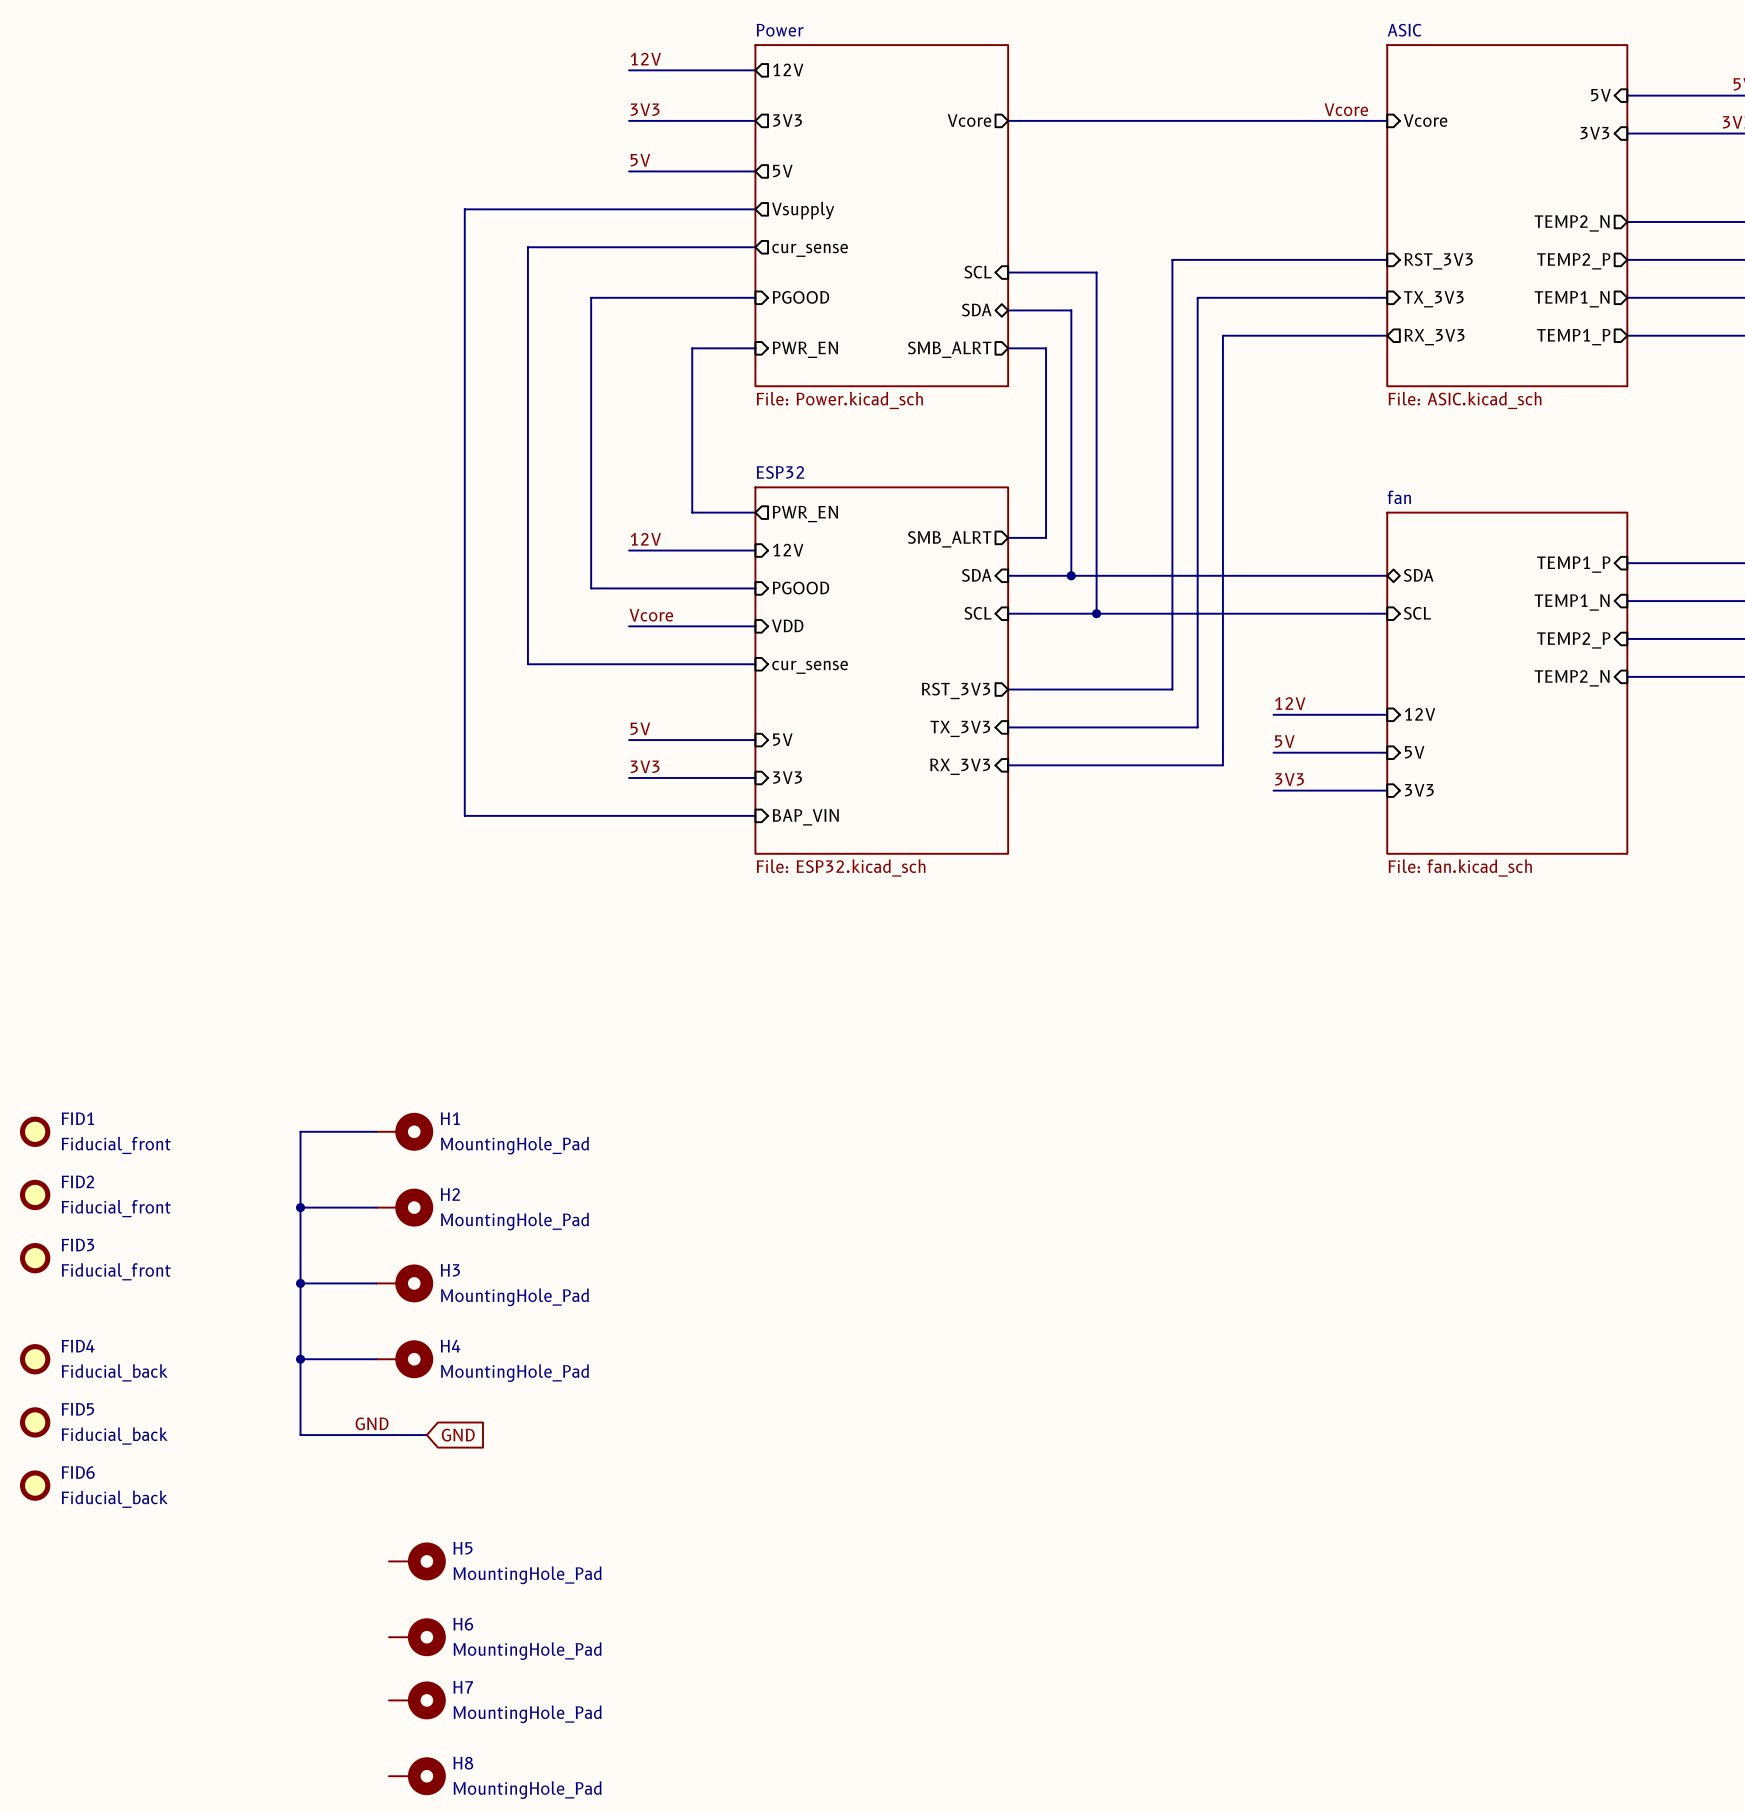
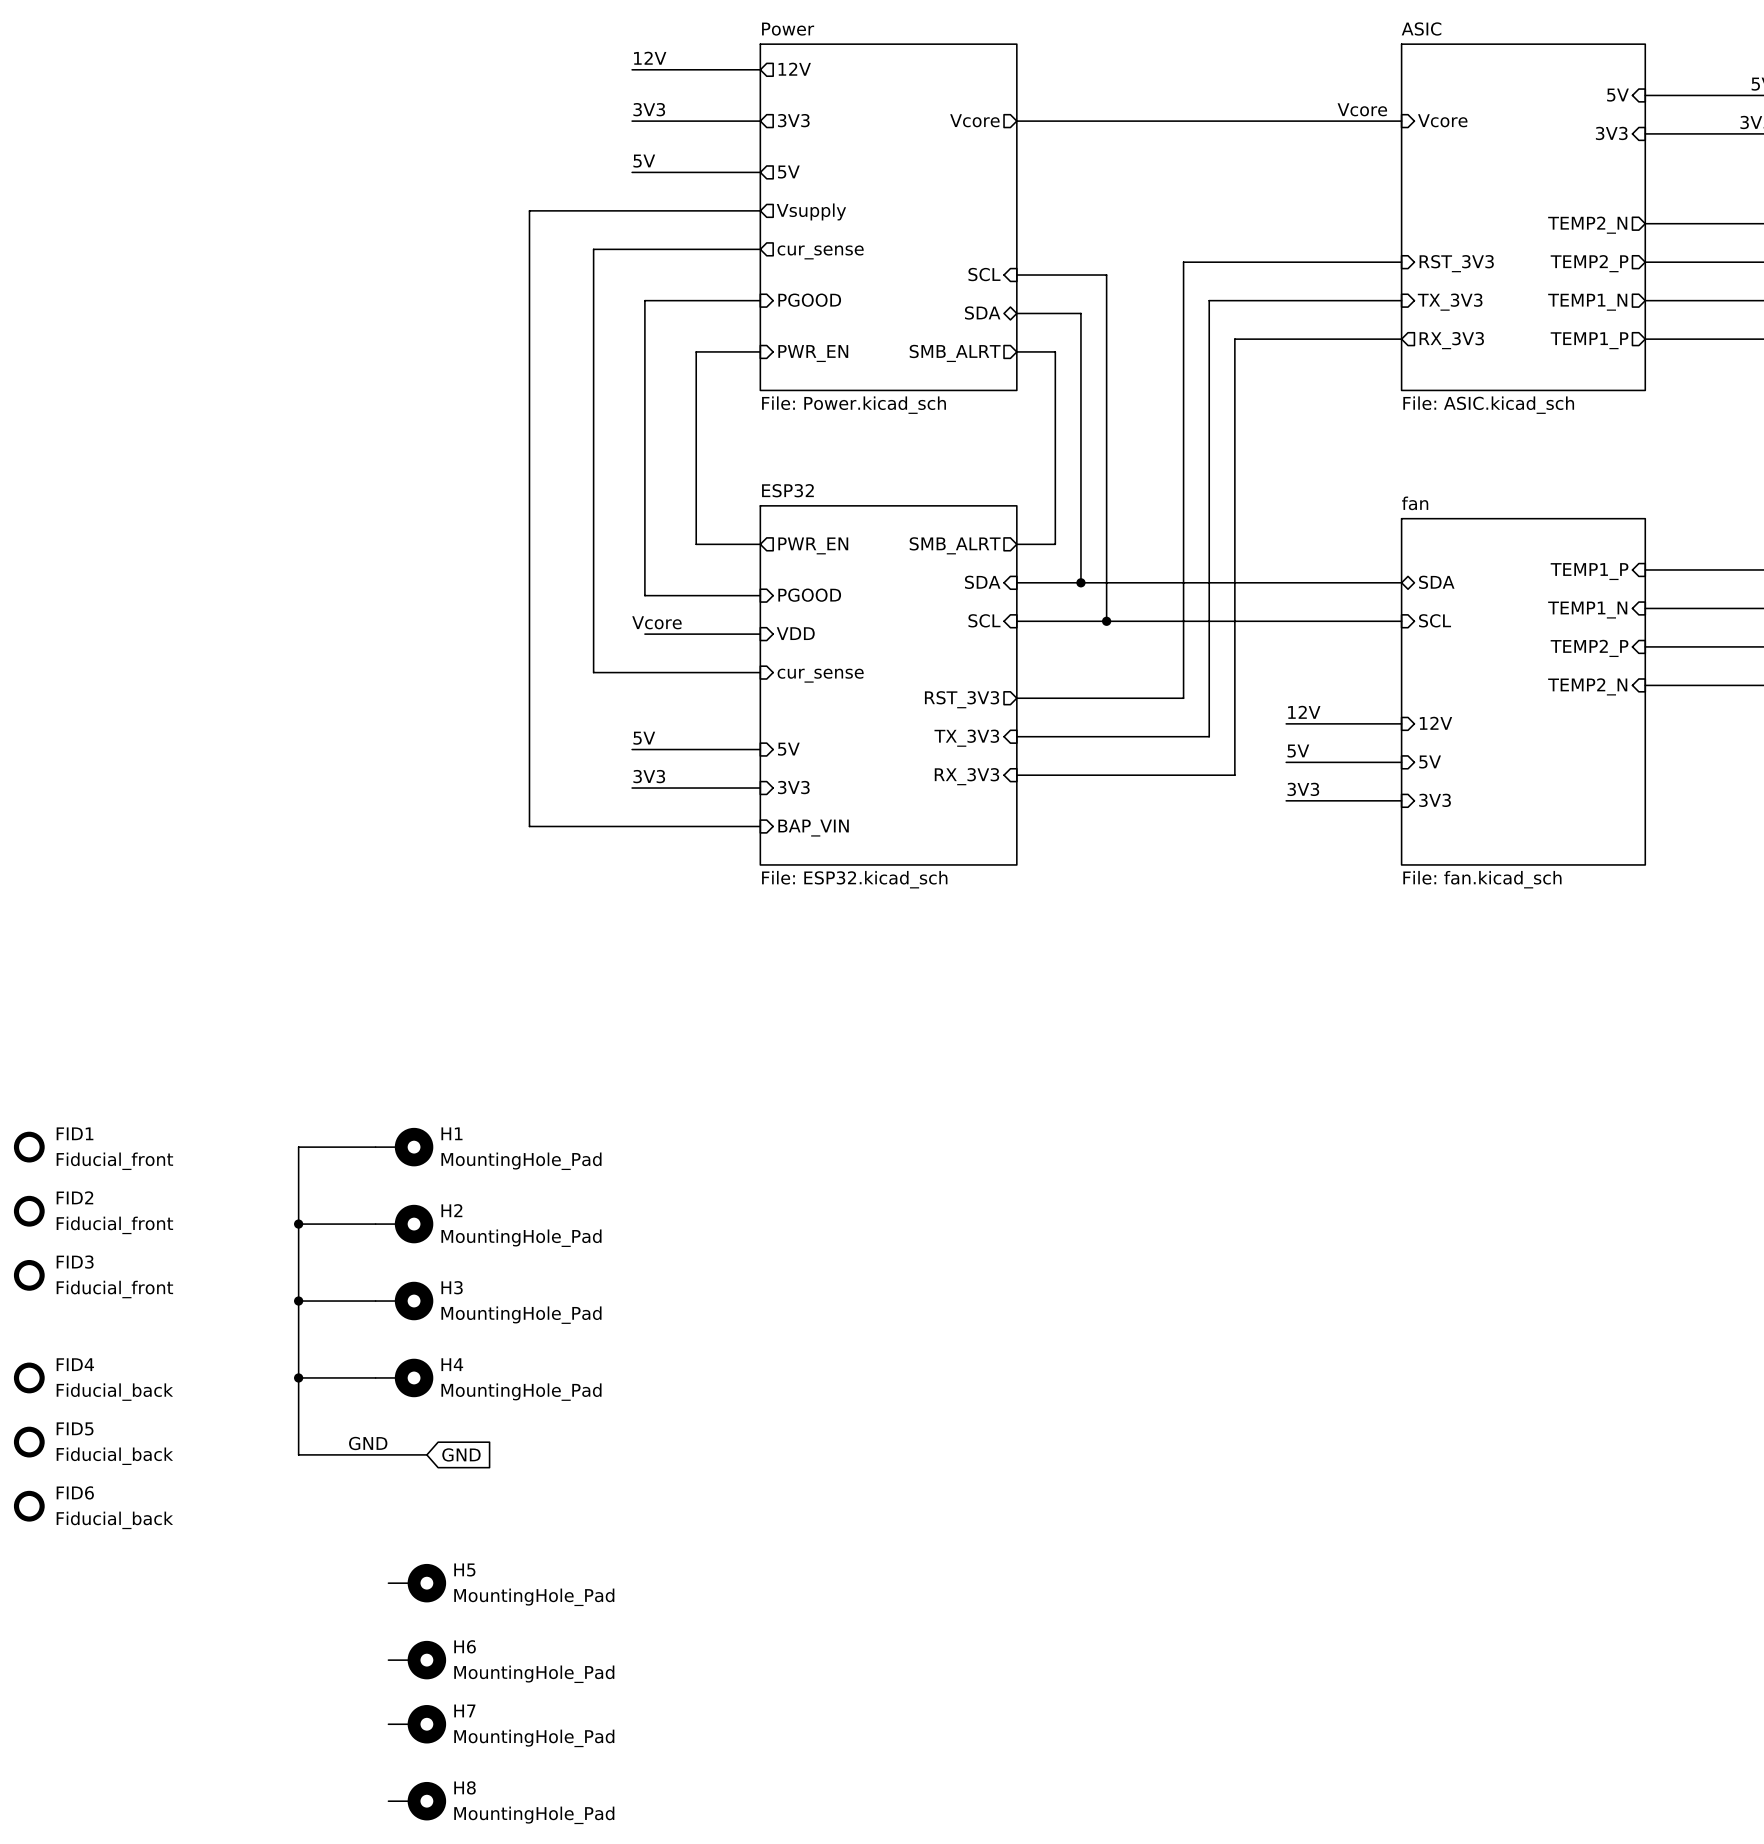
wire: (527, 209) (464, 209) (464, 815) (527, 815) -> none
wire: (527, 247) (591, 247) -> (529, 249) (529, 210)
wire: (591, 297) (641, 297) -> (593, 300) (593, 249)
wire: none -> (644, 300) (644, 595)
sheet ESP32 shape: [754, 486, 1009, 855] -> [759, 505, 1018, 866]
wire: (692, 512) (755, 512) -> (696, 518) (696, 544) (760, 544)
sheet pin position: PWR_EN (805, 514) -> PWR_EN (813, 545)
label: 12V (645, 539) -> none
wire: (629, 550) (755, 550) -> none
sheet pin: 12V (788, 550) -> none
wire: (591, 588) (641, 588) -> (593, 595) (593, 672)
wire: (629, 626) (641, 626) -> none
wire: (527, 664) (591, 664) -> (529, 672) (529, 826)

